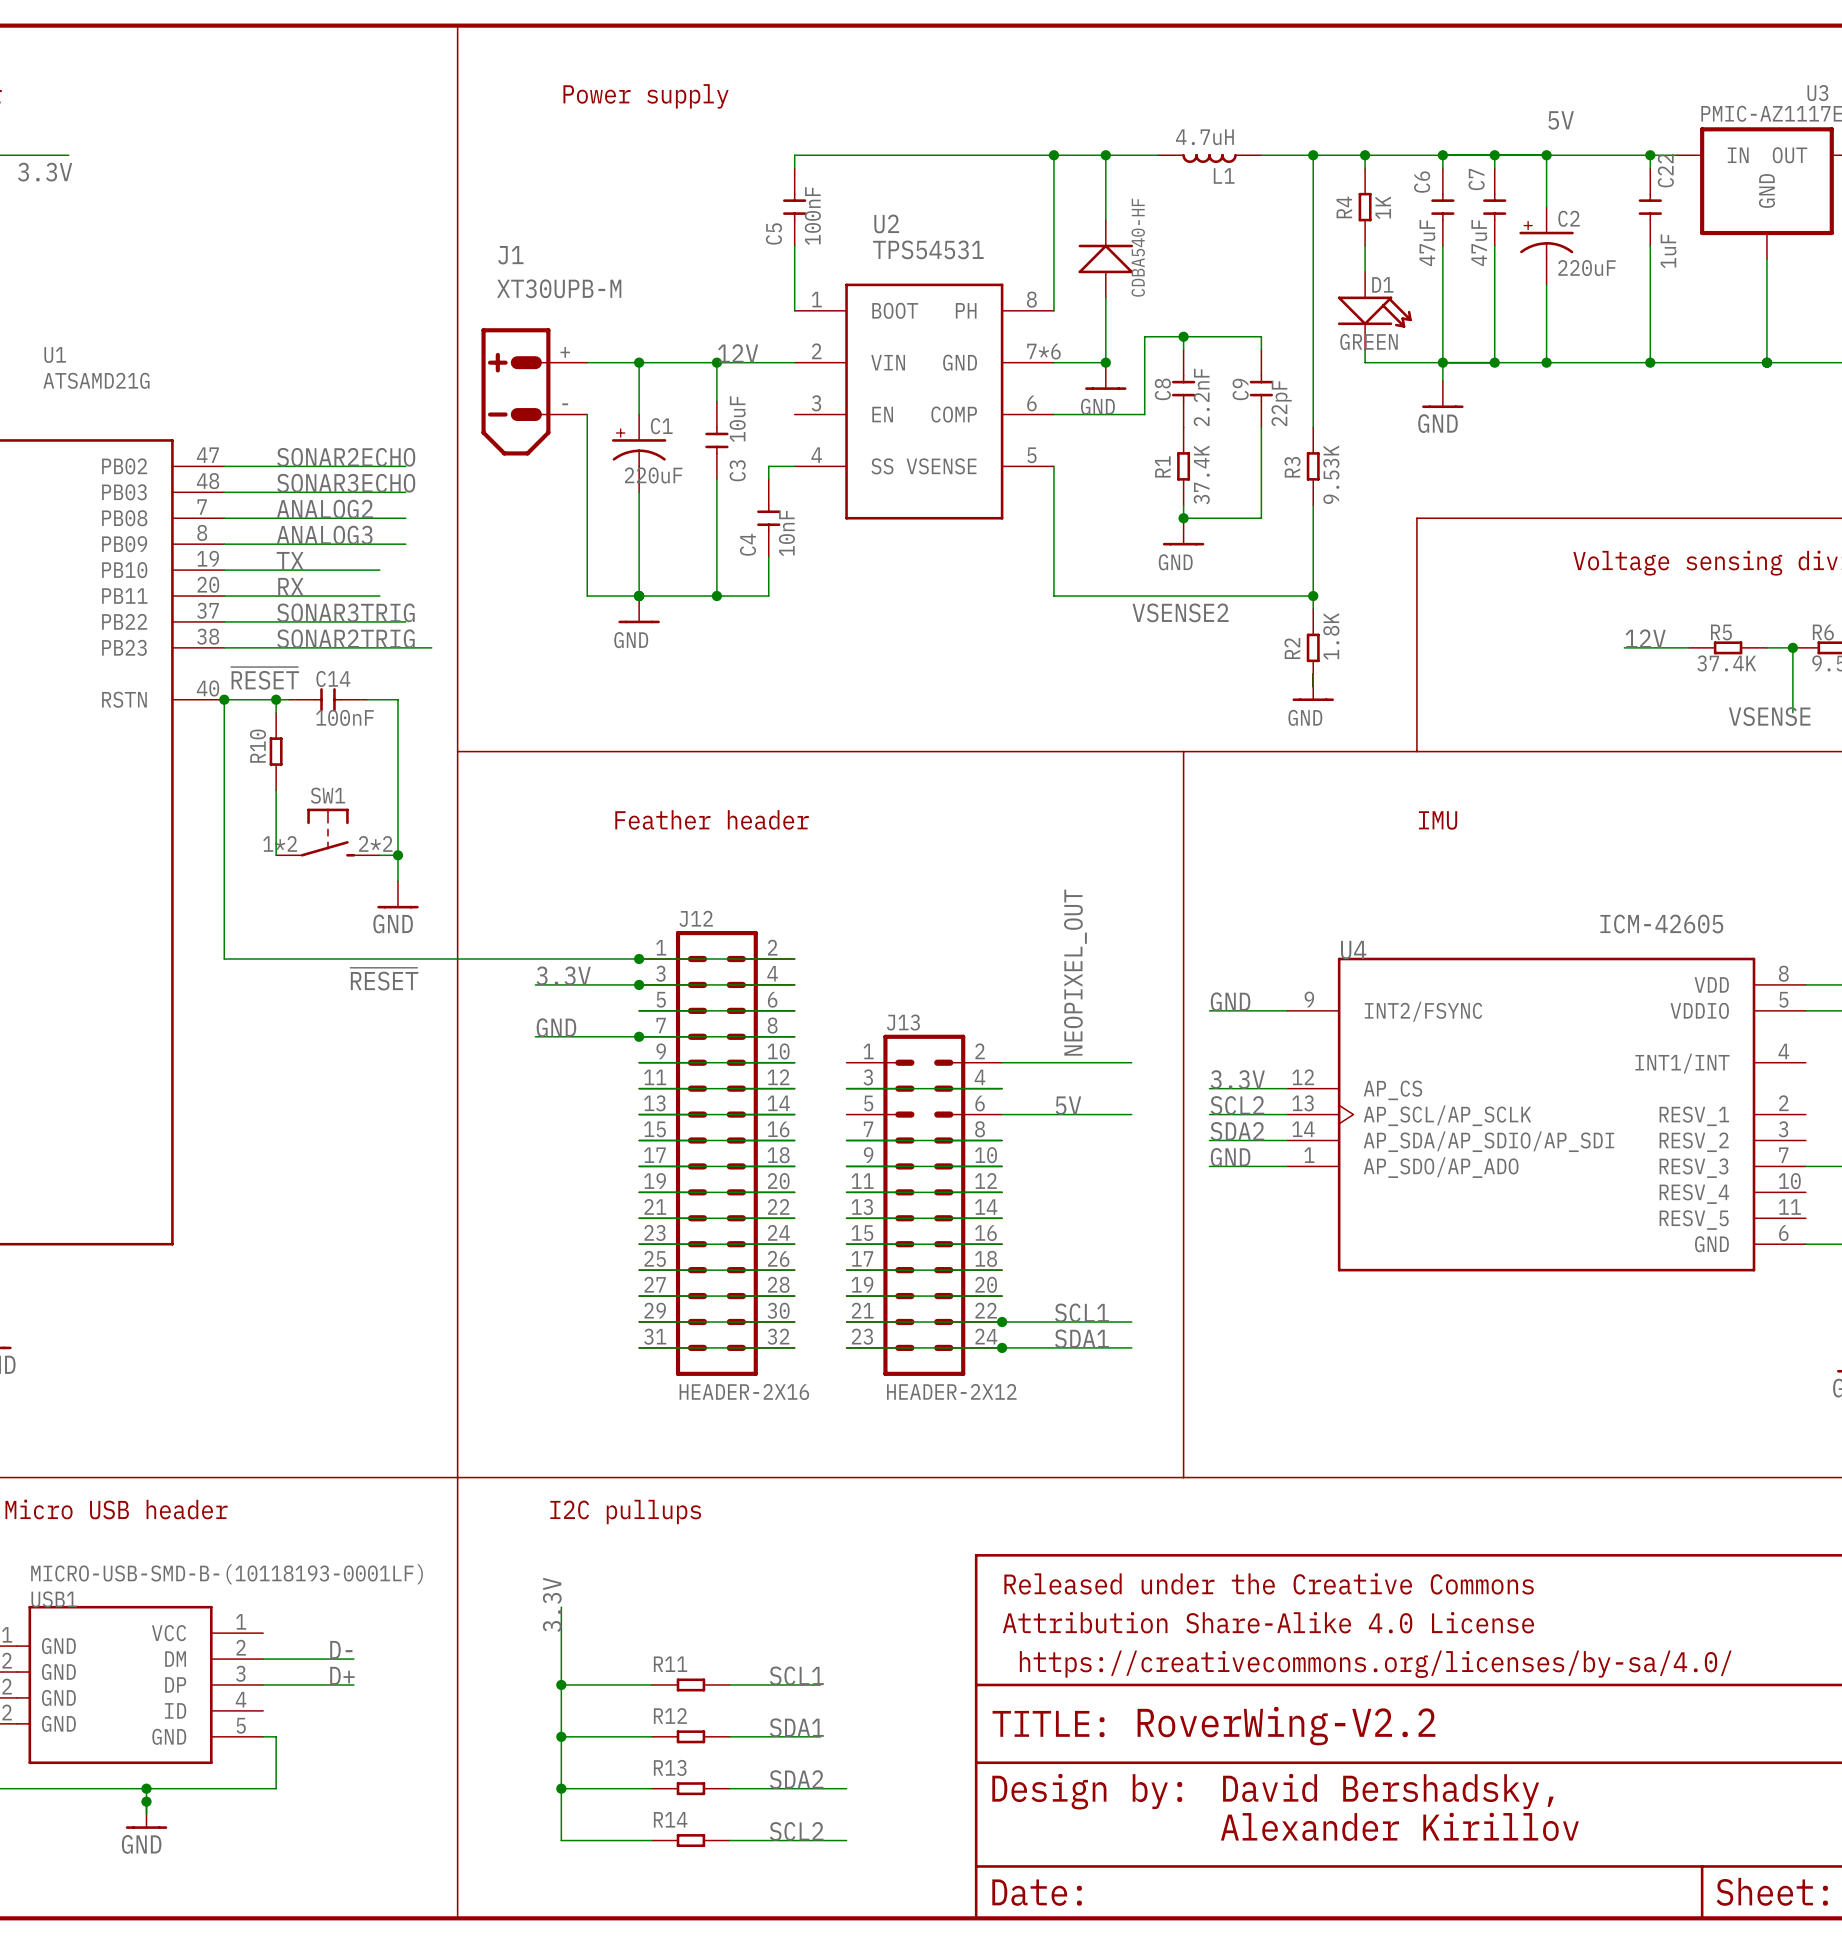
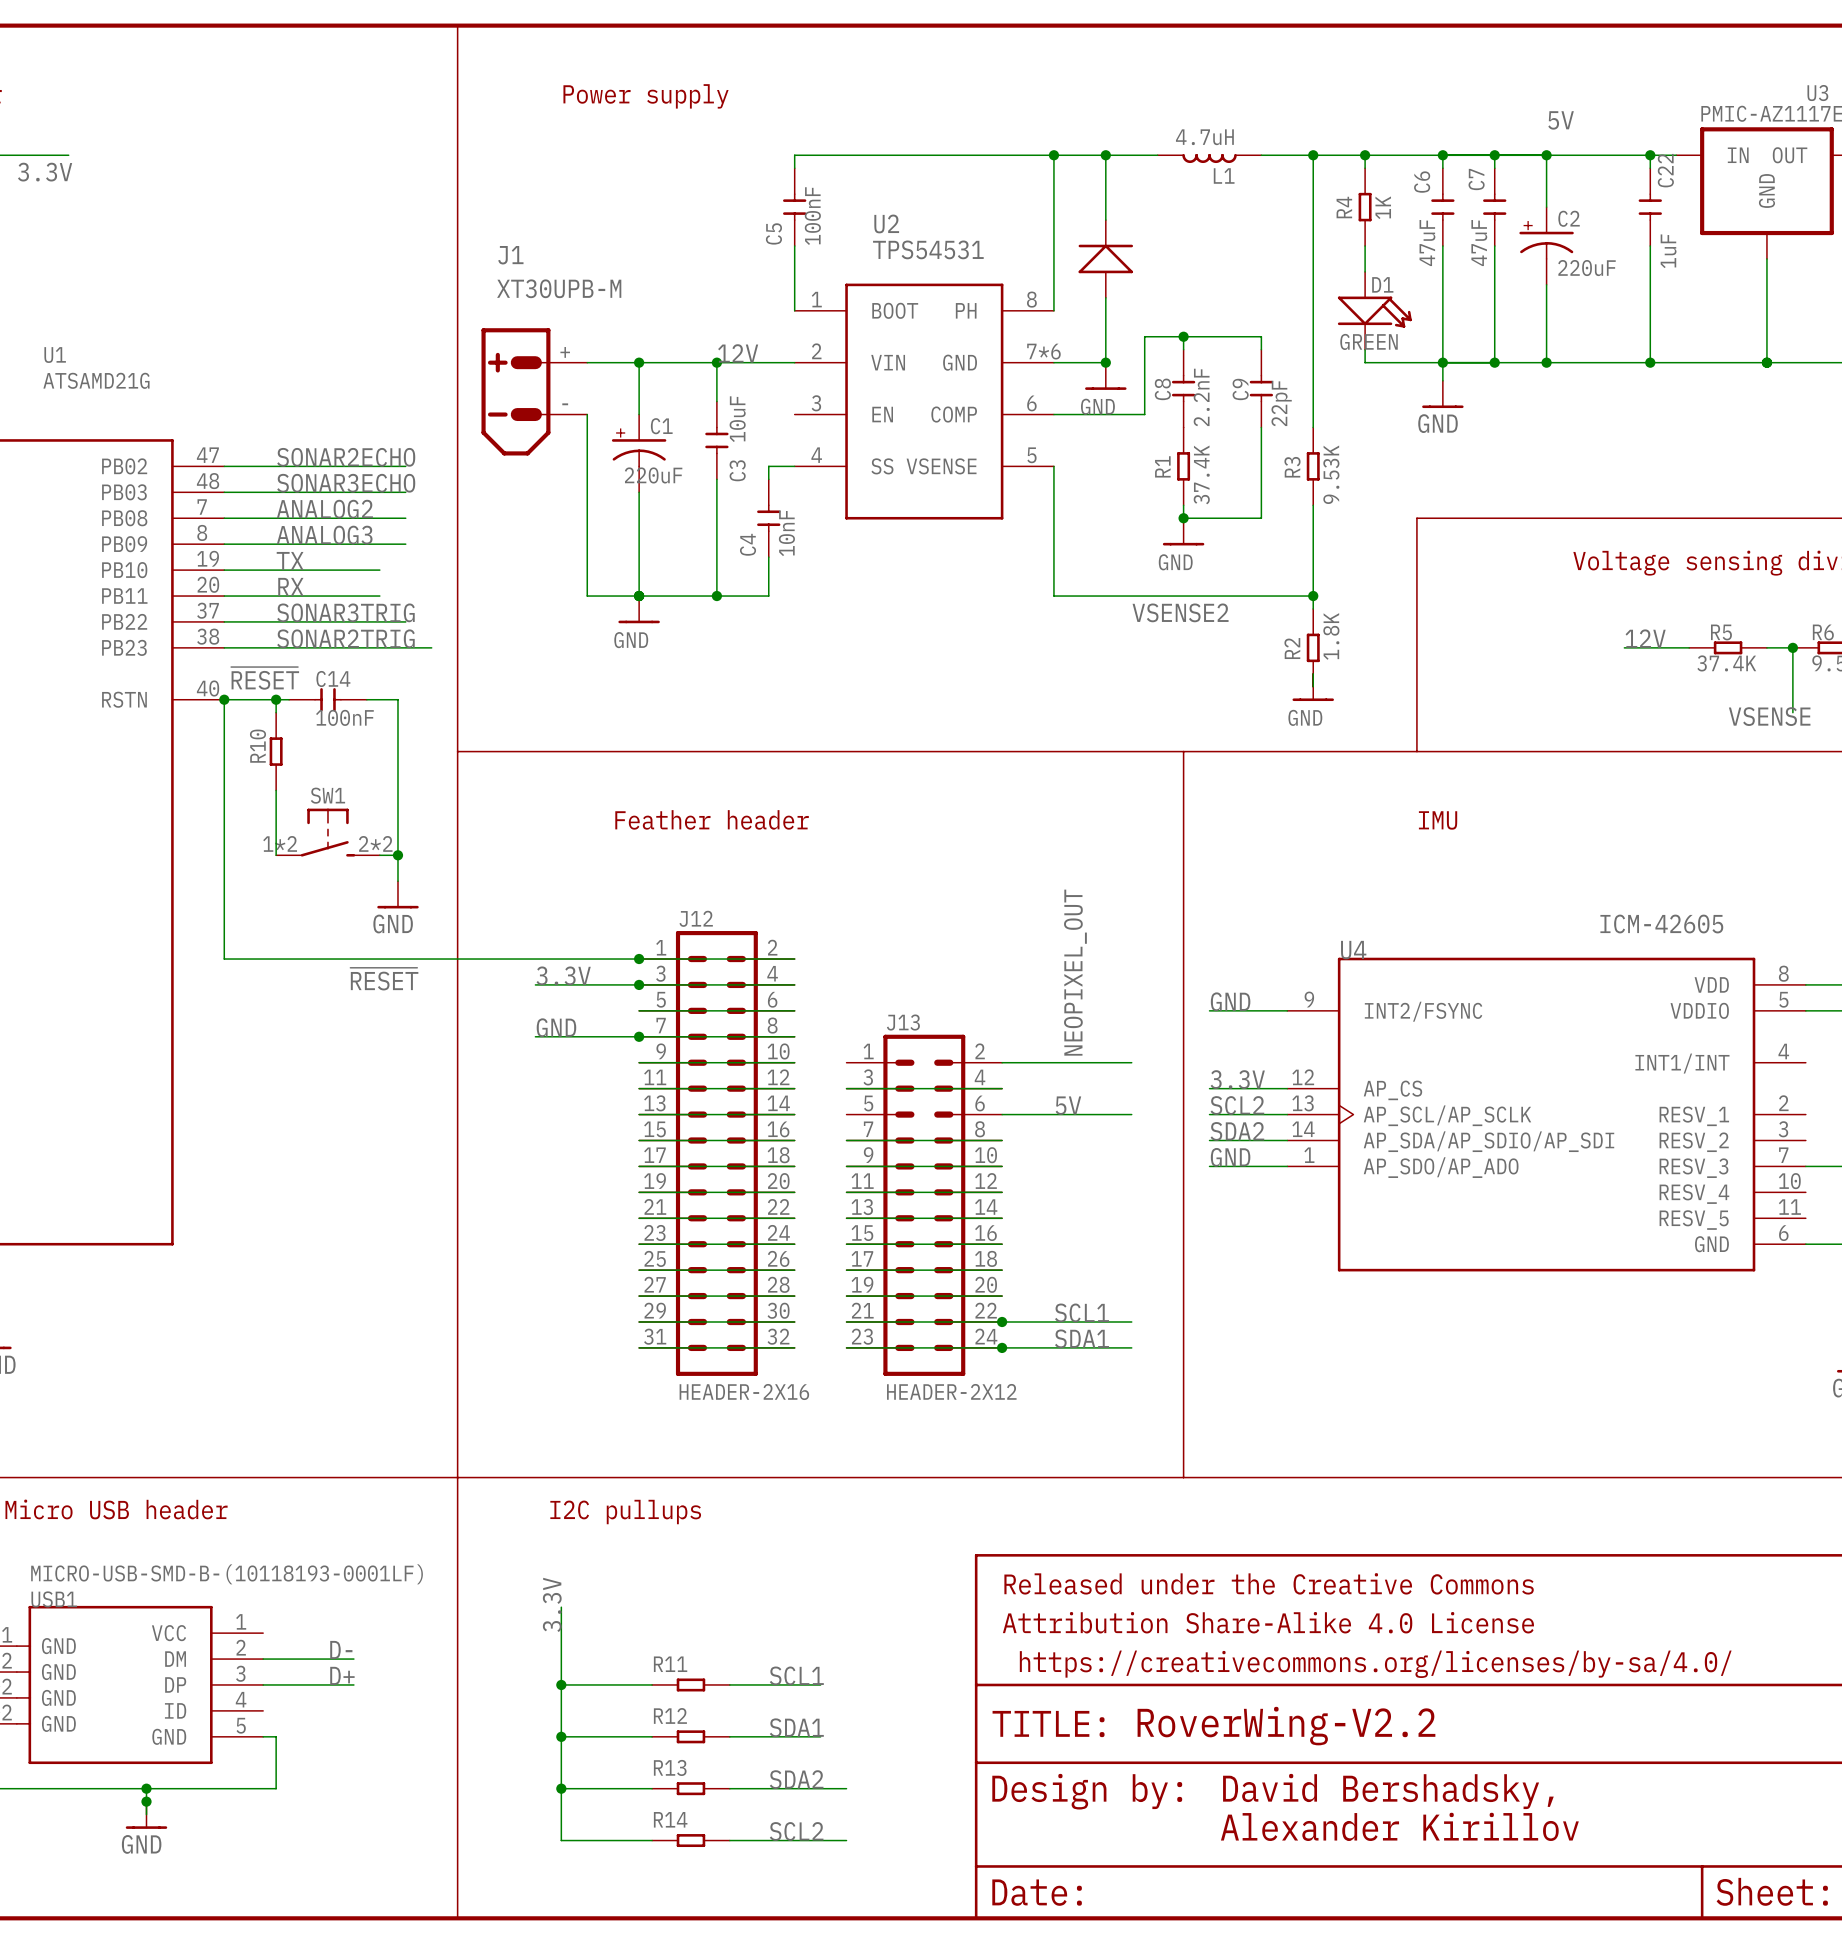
part value: CDBA540-HF (1138, 247) -> none

